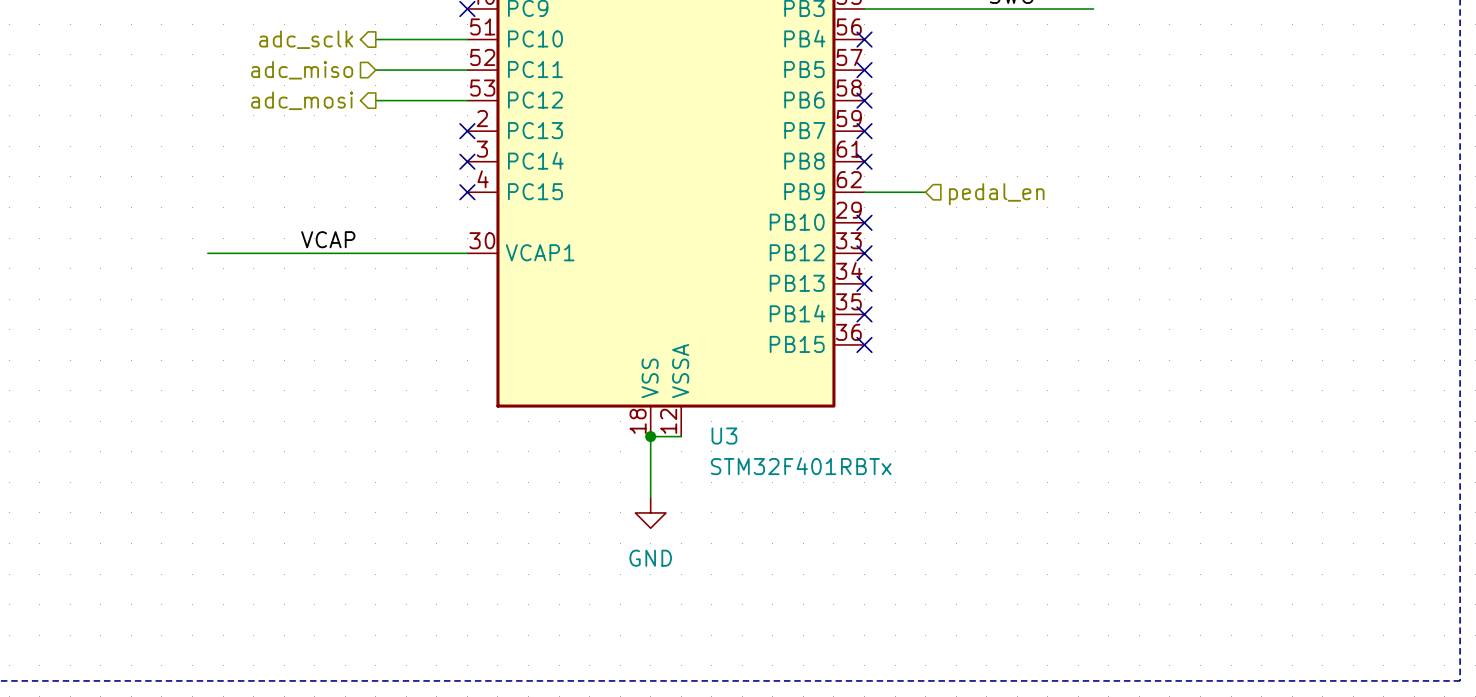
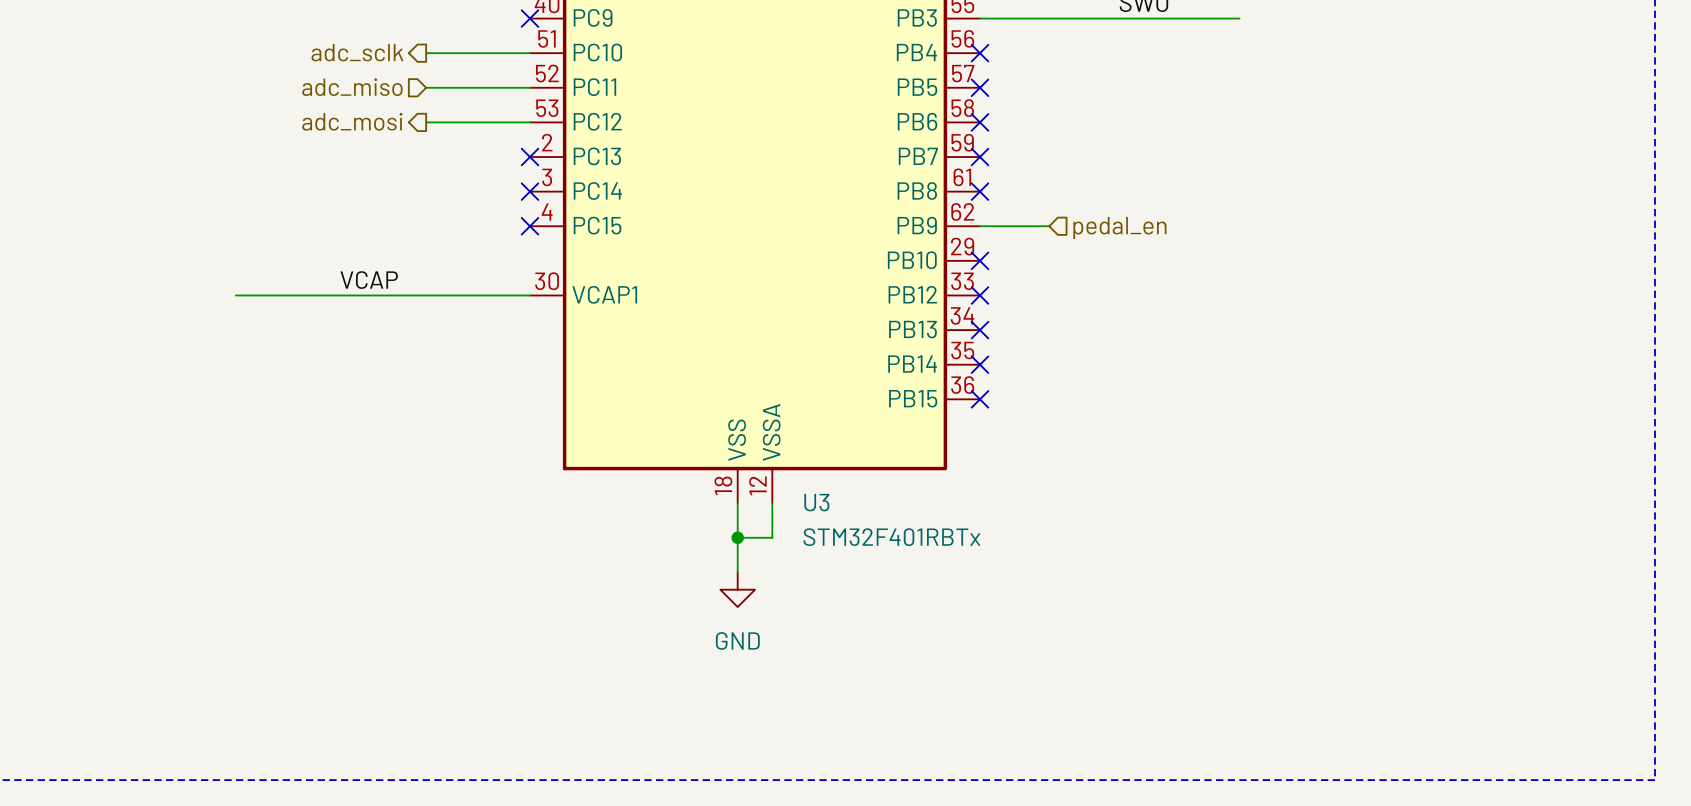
wire: (650, 436) (681, 436) -> (737, 537) (772, 537) (772, 503)
junction position: (650, 436) -> (737, 537)

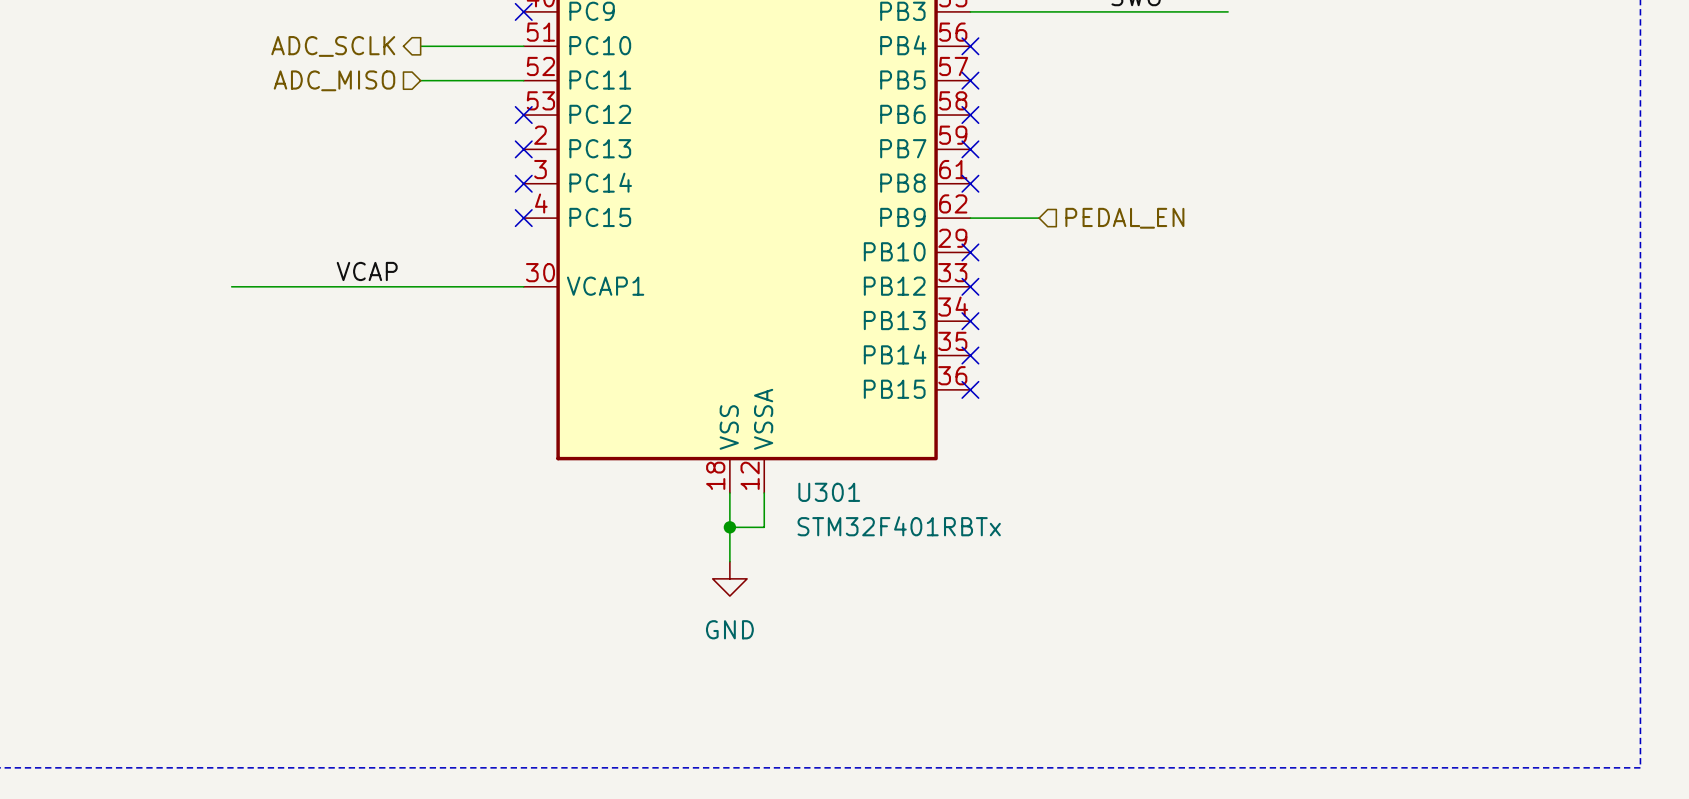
hierarchical label: adc_sclk (357, 52) -> ADC_SCLK (333, 46)
hierarchical label: adc_miso (352, 87) -> ADC_MISO (334, 80)
hierarchical label: adc_mosi (352, 121) -> none
wire: (426, 122) (530, 122) -> none
no-connect mark: none -> (523, 115)
hierarchical label: pedal_en (1119, 228) -> PEDAL_EN (1124, 218)
U3 name: U3 (816, 502) -> U301 (829, 492)

